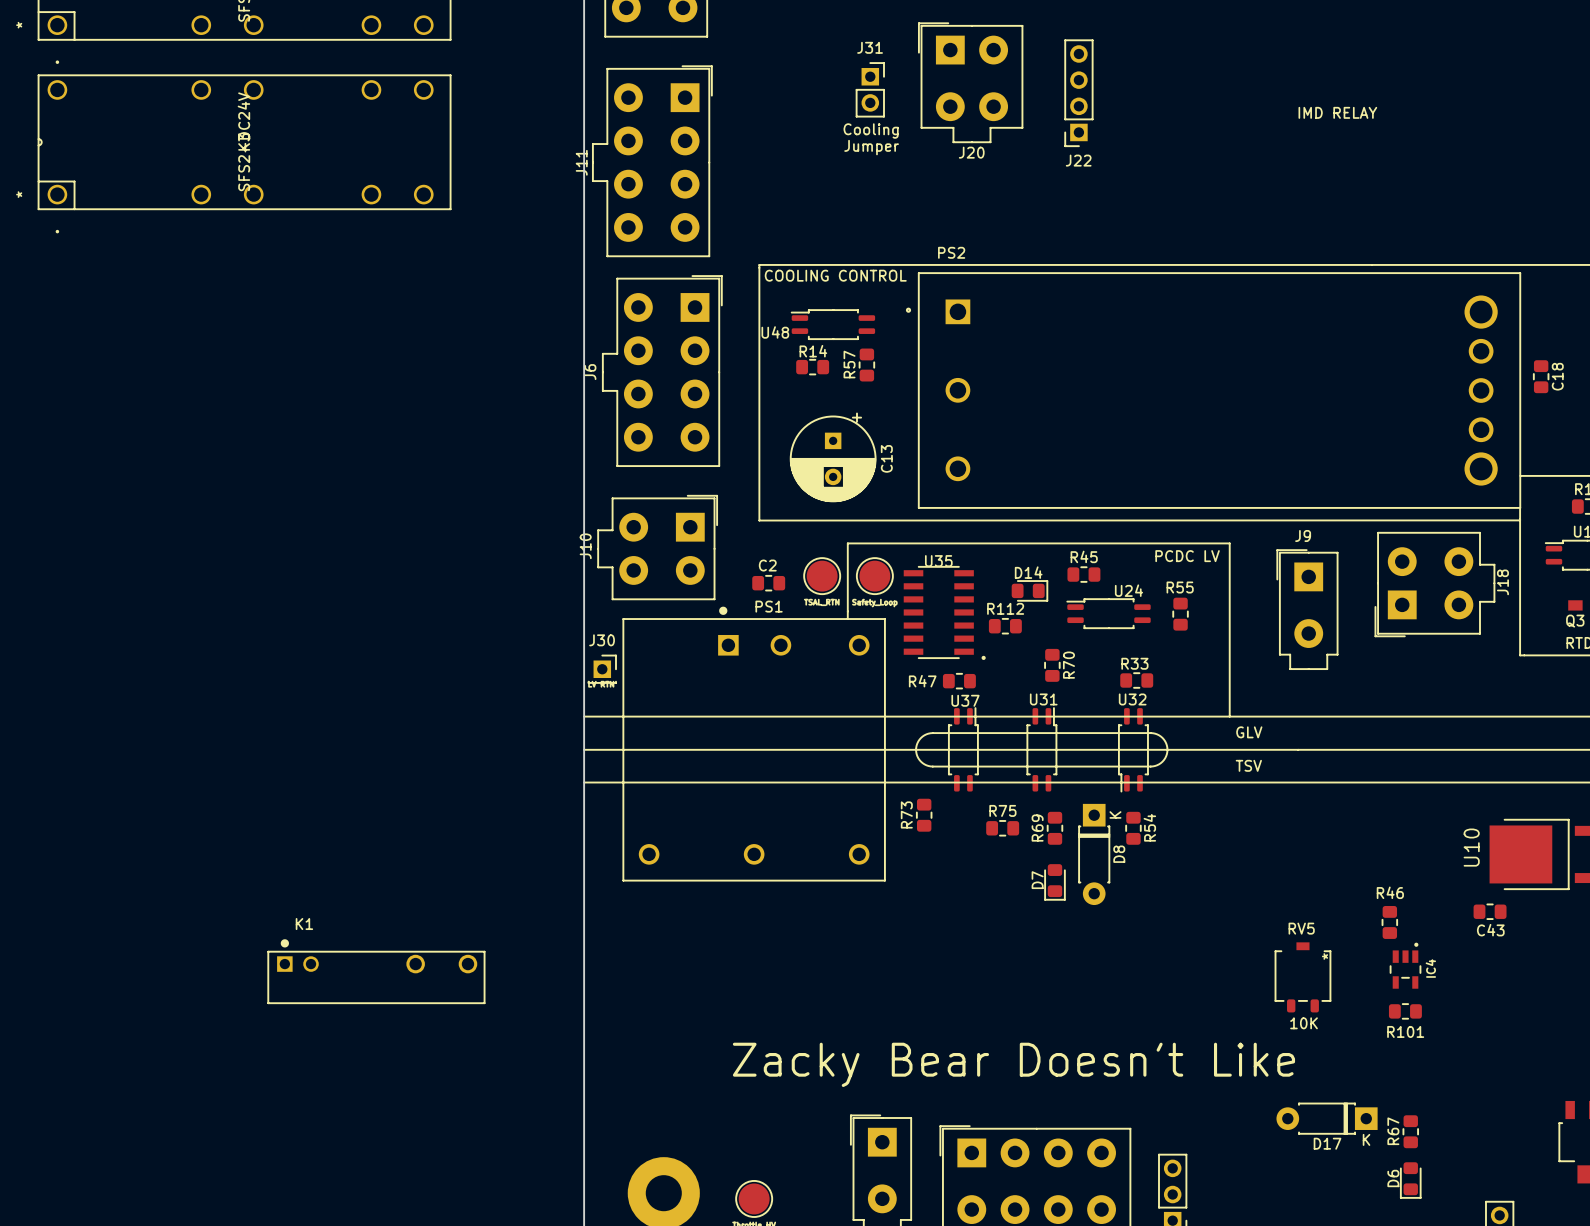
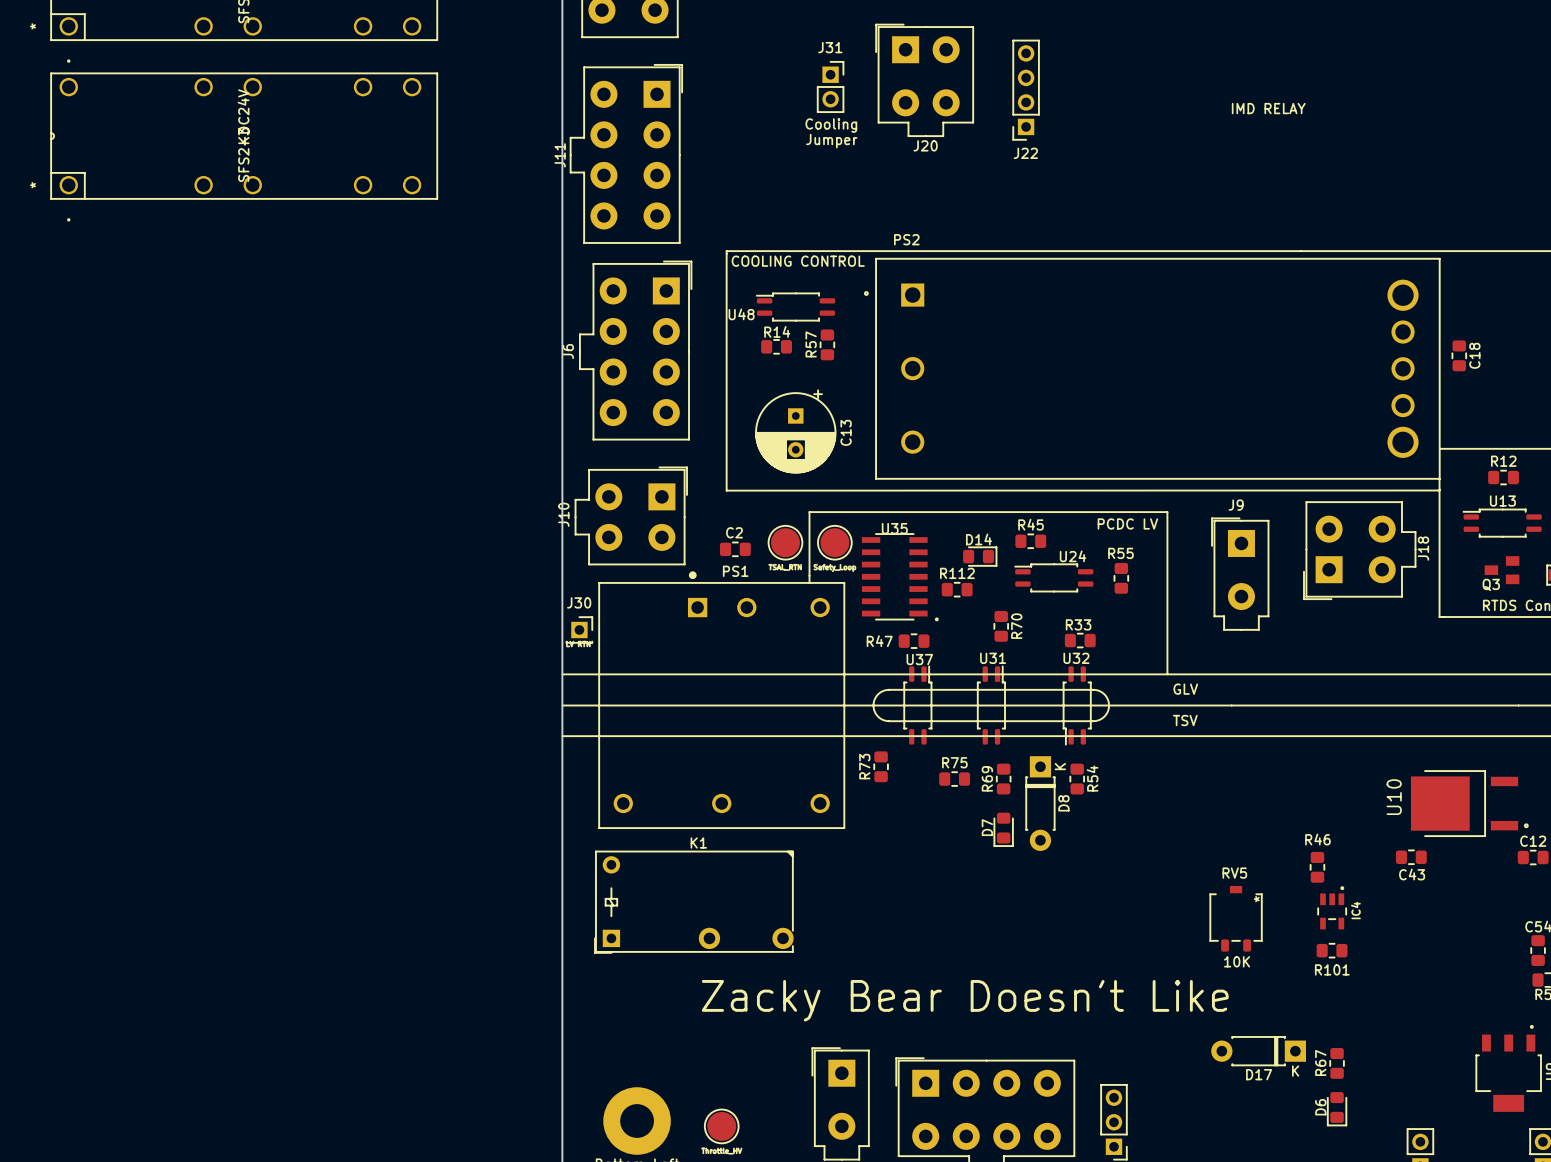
K1 name position: K1 (304, 924) -> K1 (698, 843)
K1 footprint: [267, 939, 486, 1004] -> [594, 850, 794, 954]

